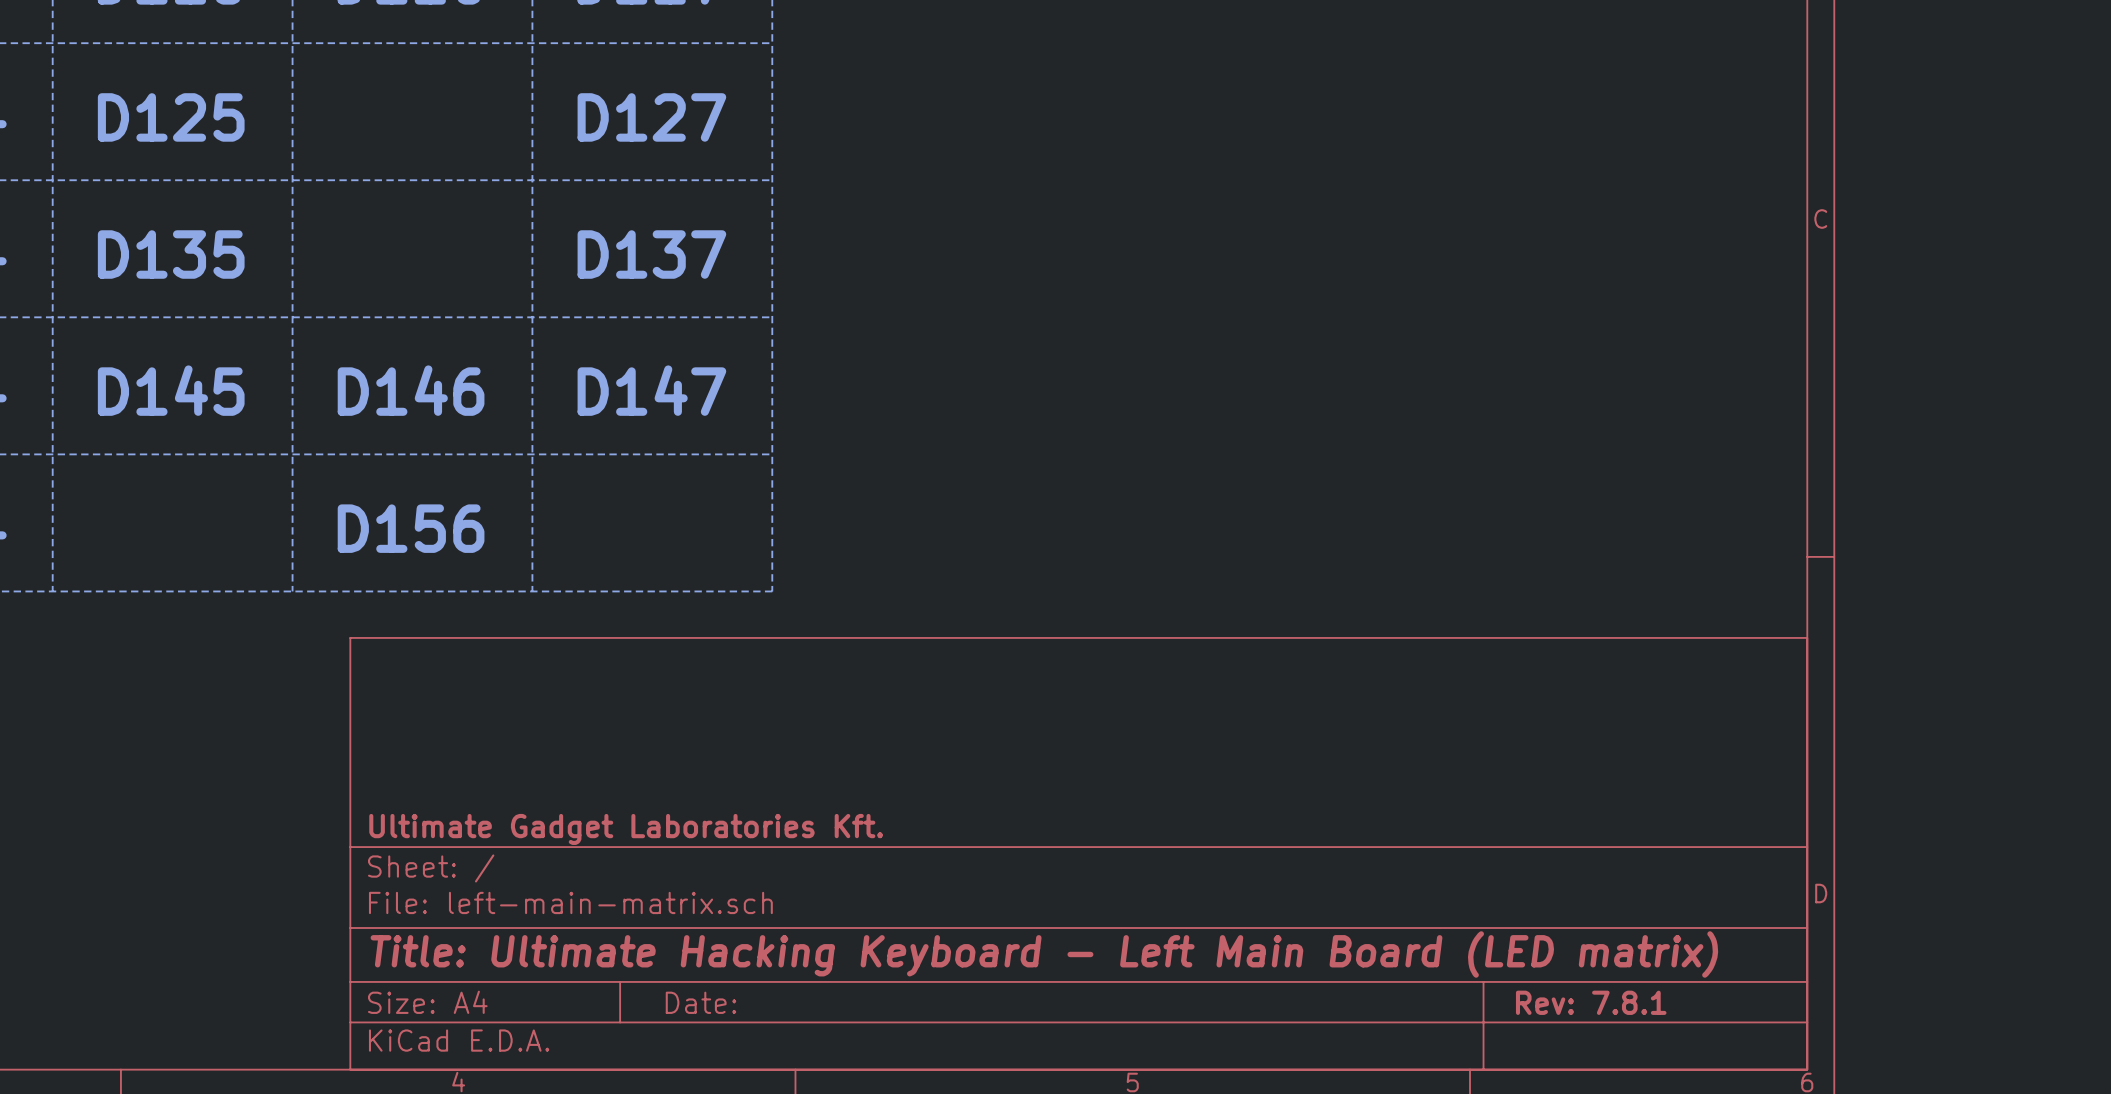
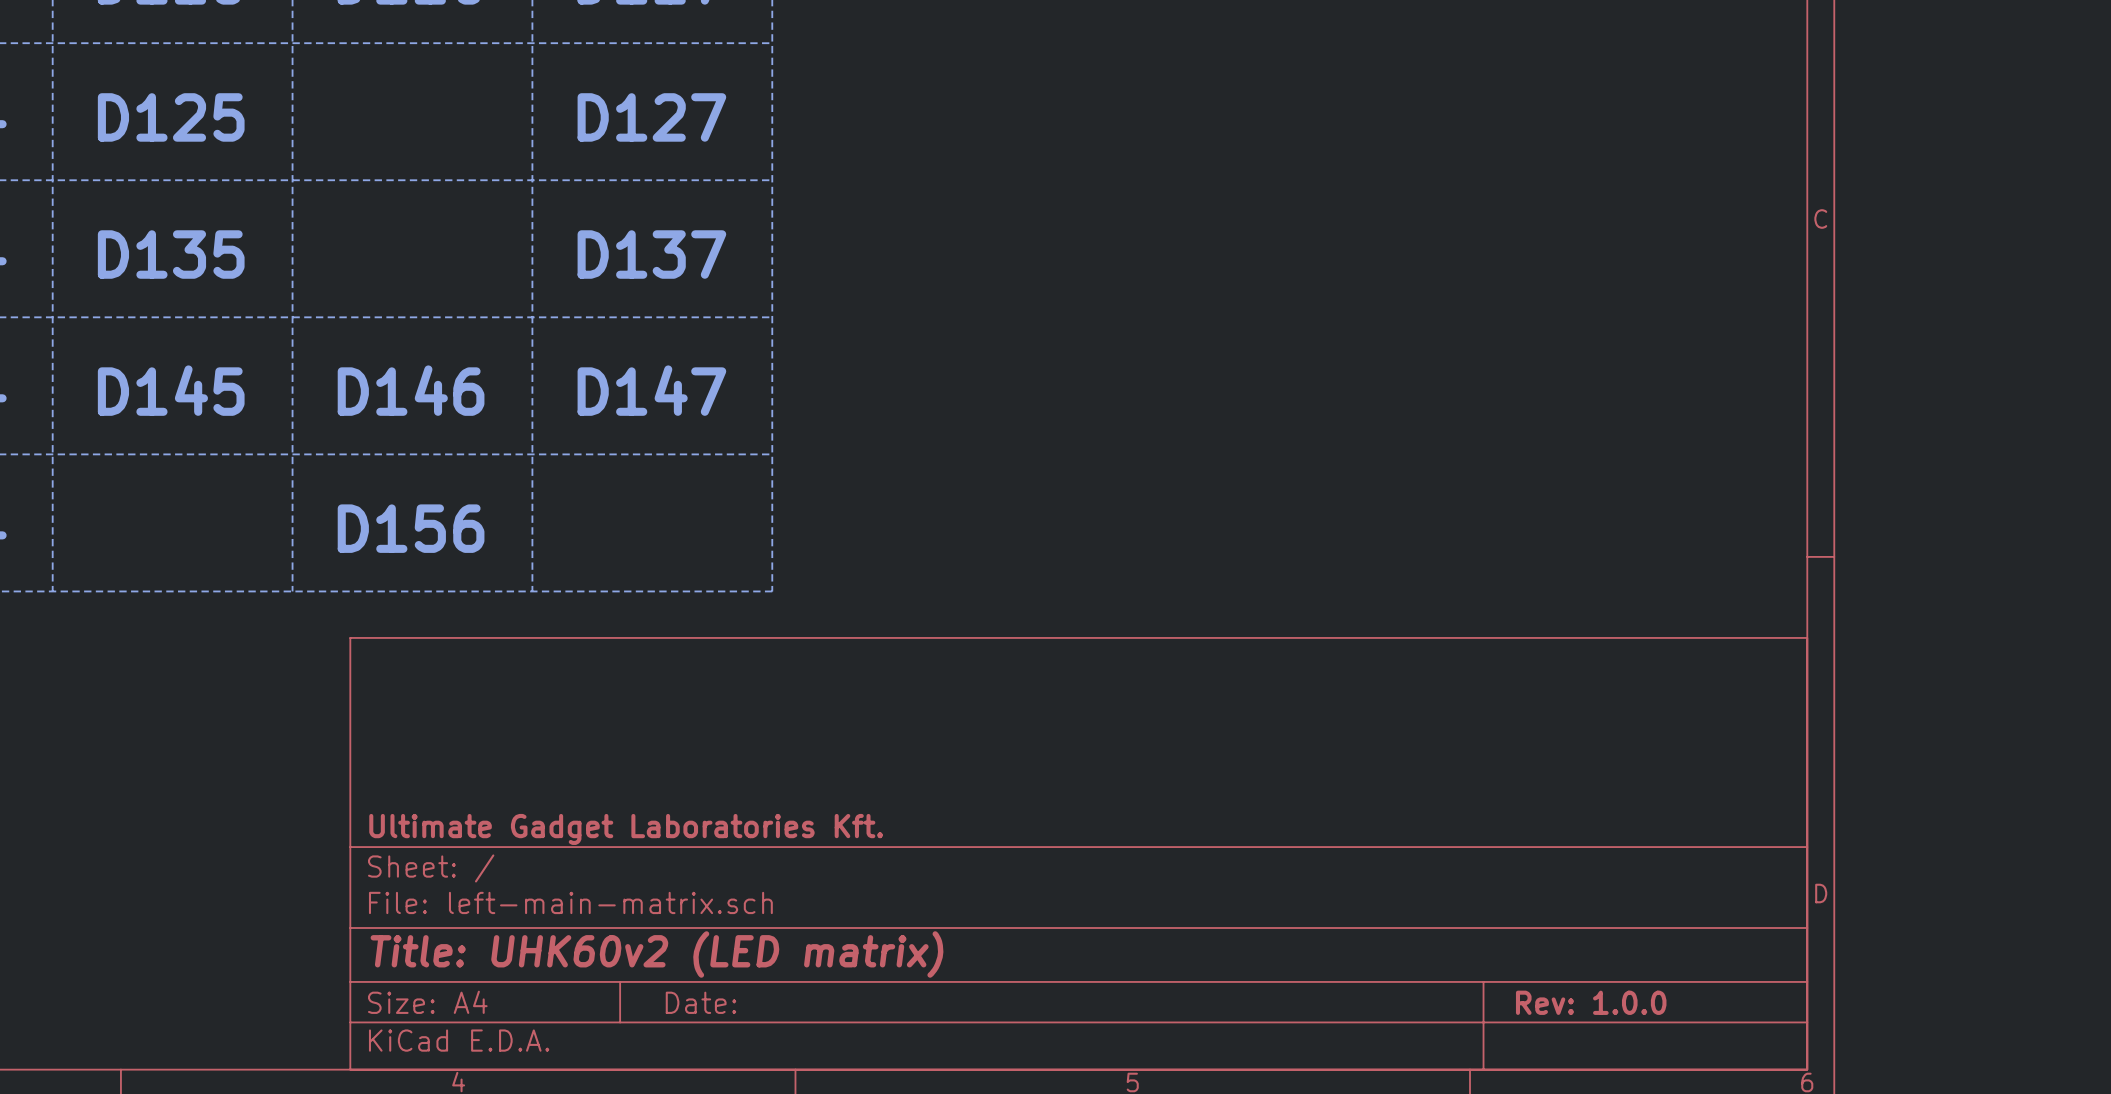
title block: Title: Ultimate Hacking Keyboard - Left Main Board (LED matrix) (1044, 954) -> Title: UHK60v2 (LED matrix) (657, 954)
title block: Rev: 7.8.1 (1591, 1002) -> Rev: 1.0.0 (1591, 1002)

